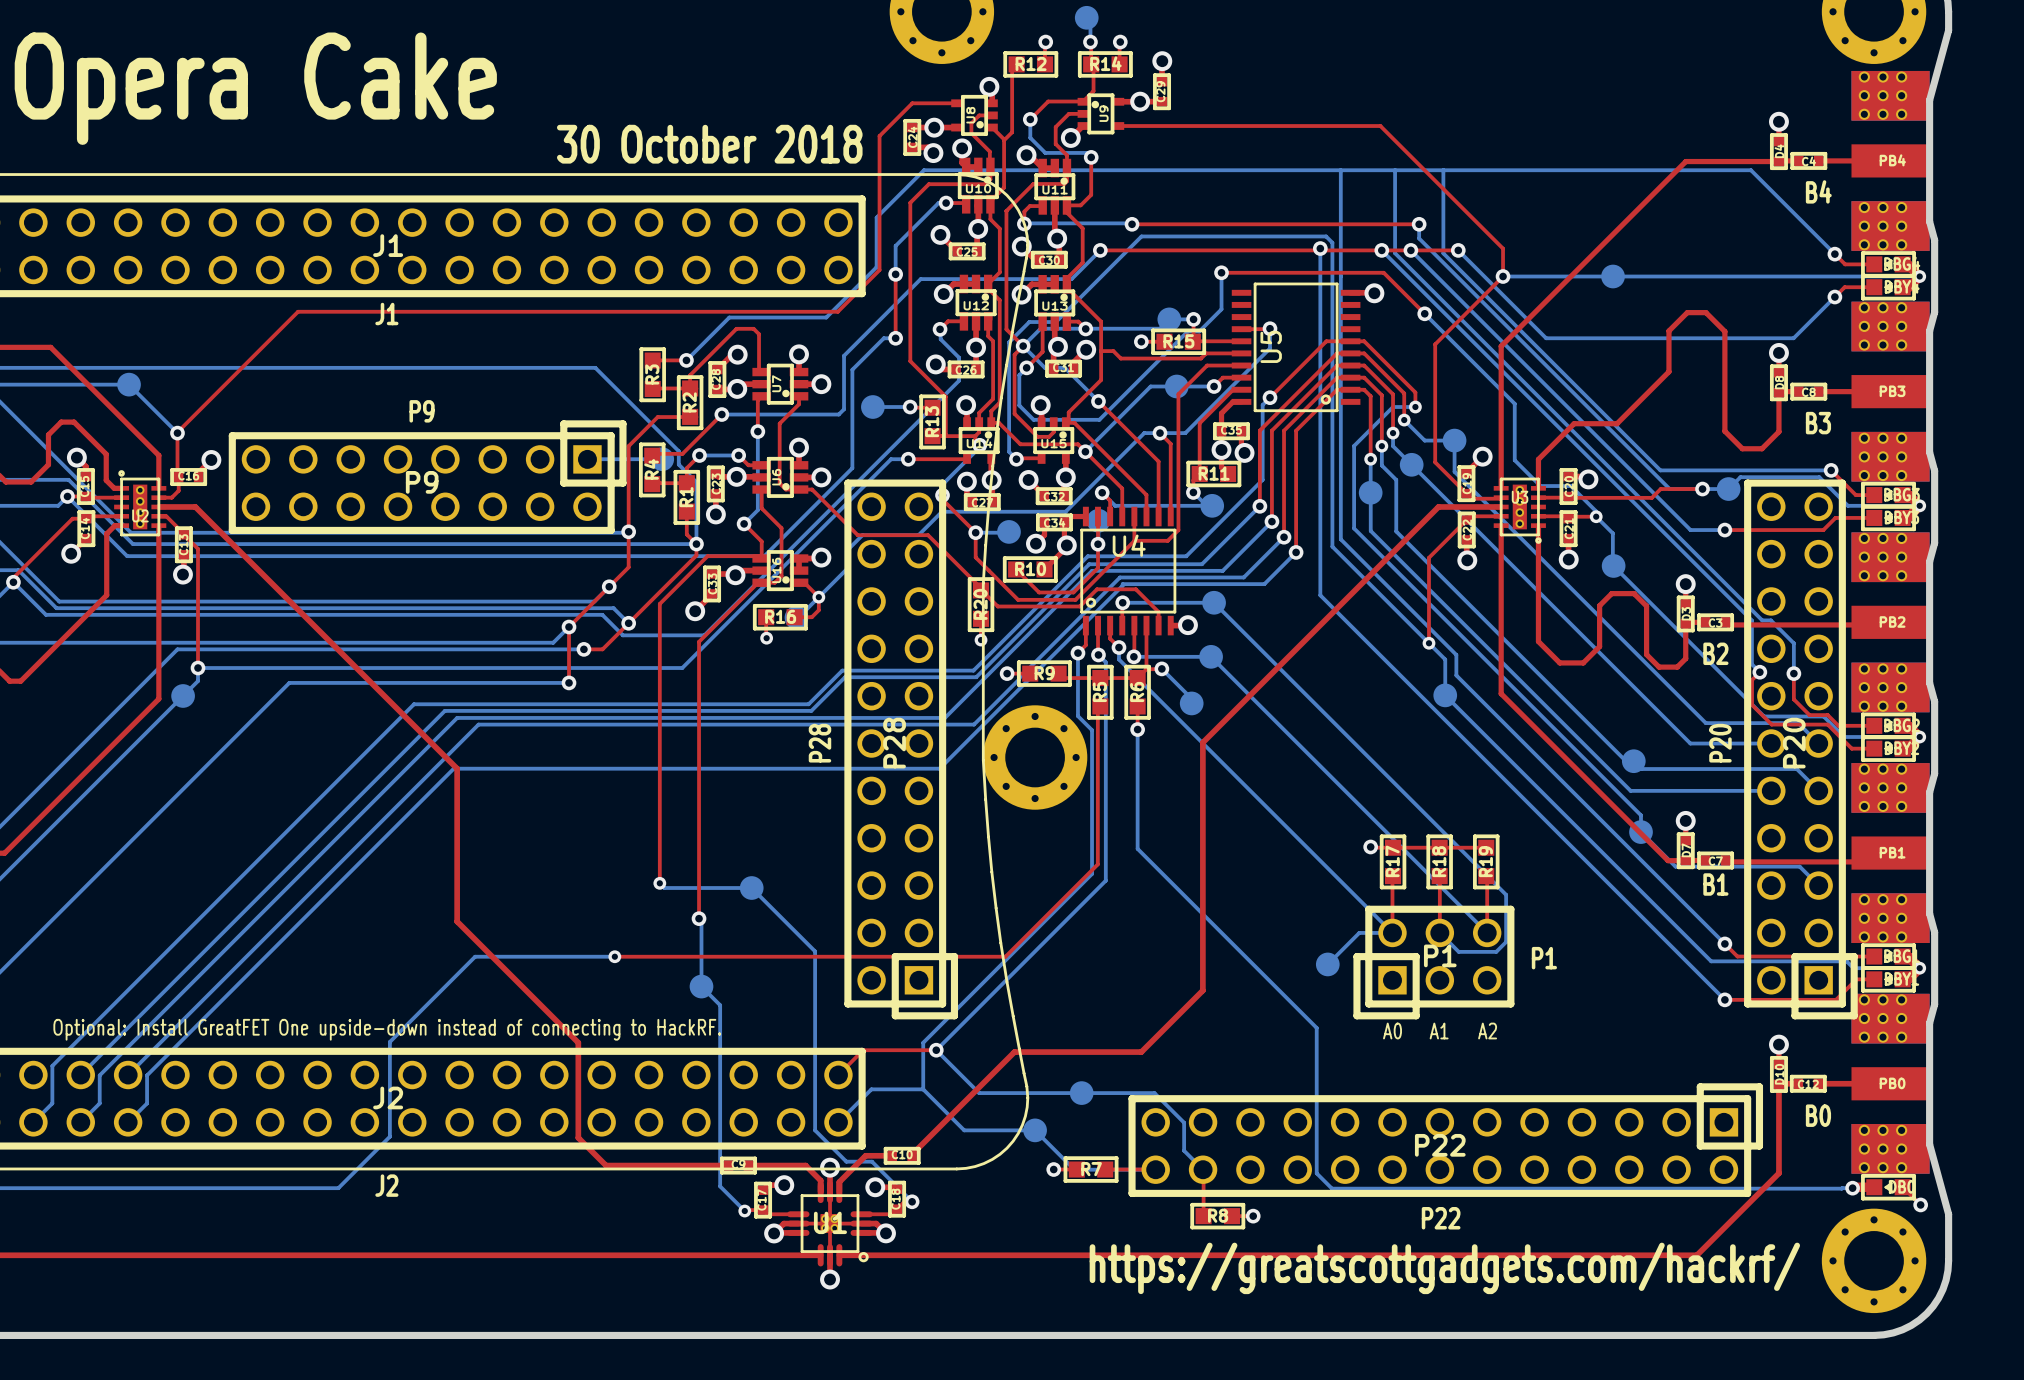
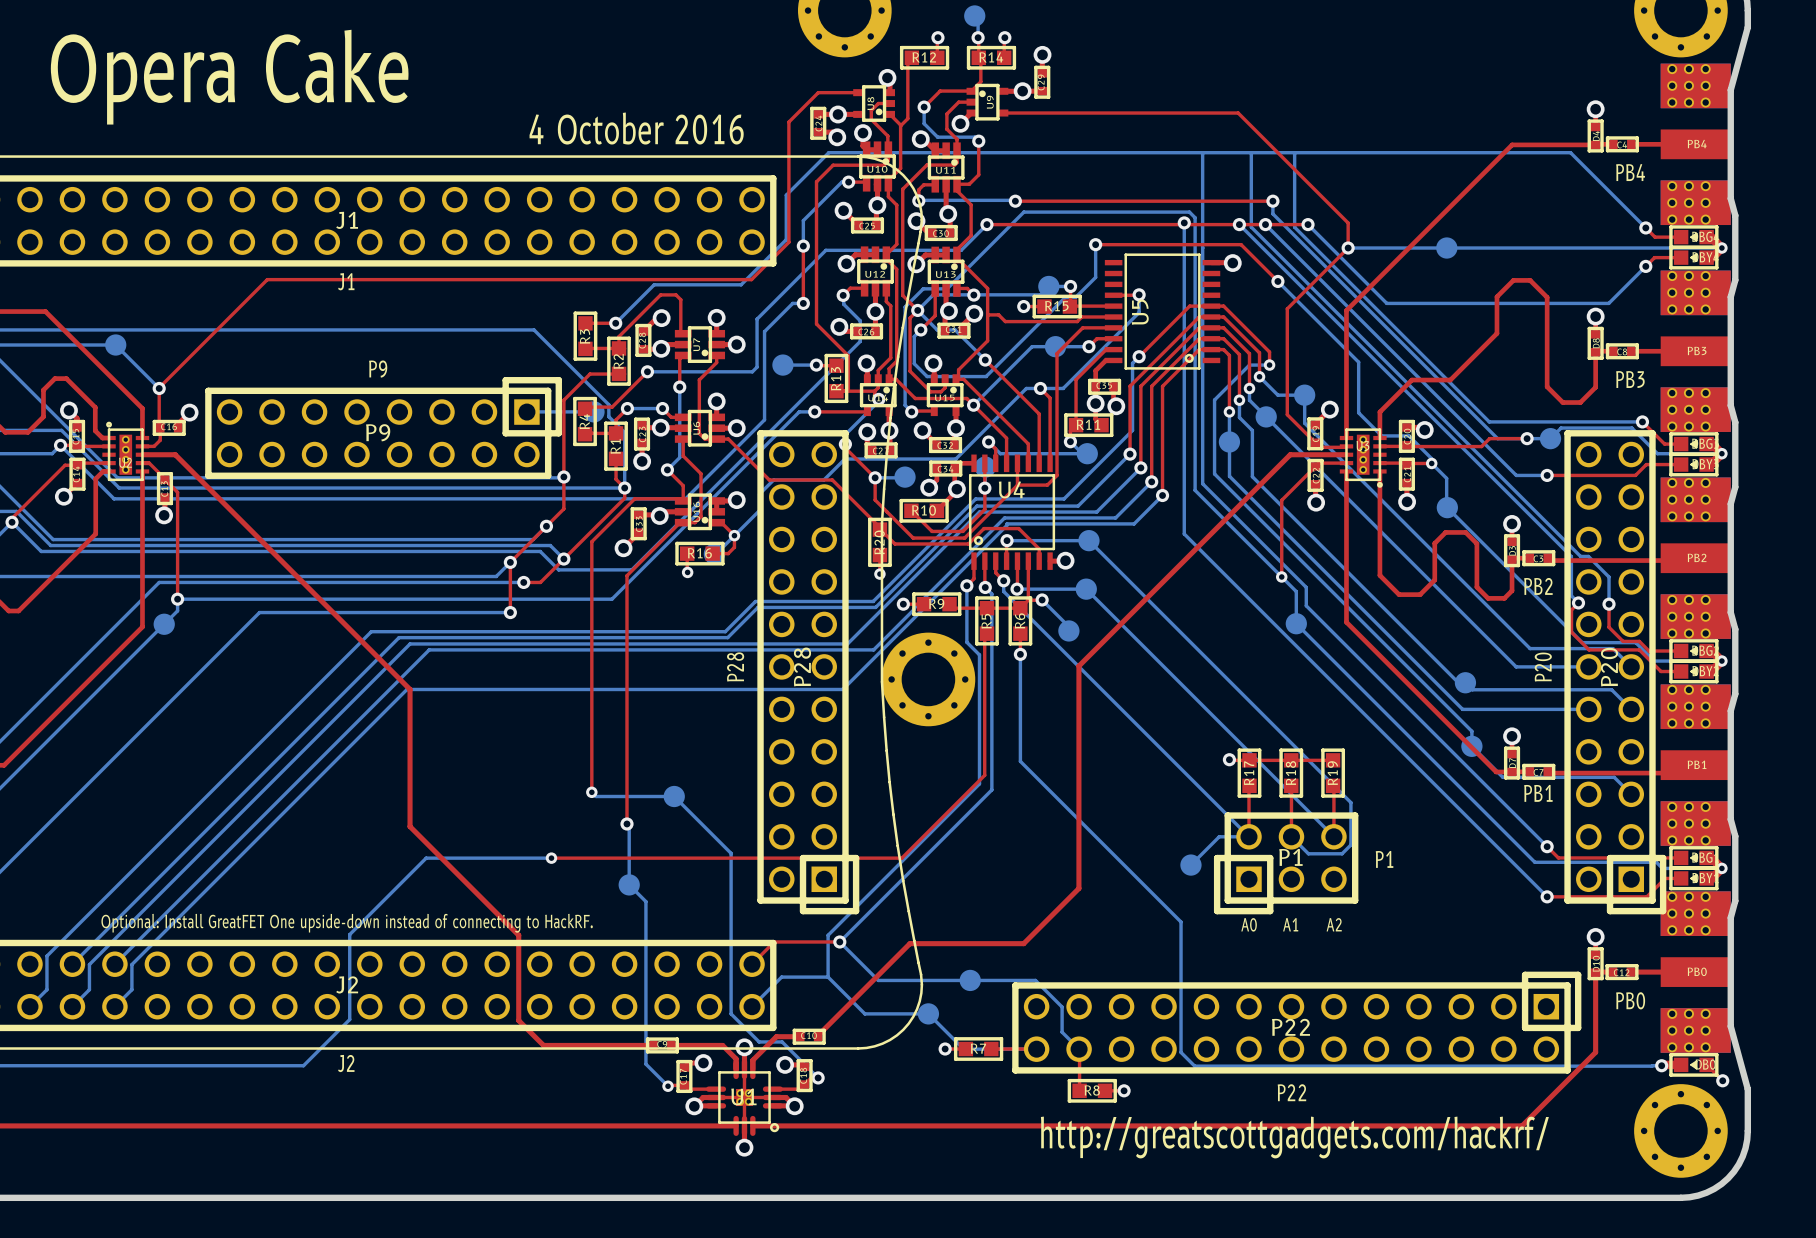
text: 30 October 2018 (709, 144) -> 4 October 2016 (636, 128)
text: B4 (1818, 191) -> PB4 (1630, 172)
text: B3 (1818, 423) -> PB3 (1630, 379)
text: B2 (1715, 653) -> PB2 (1538, 586)
text: B1 (1715, 884) -> PB1 (1538, 793)
text: B0 (1818, 1115) -> PB0 (1630, 1000)
text: https://greatscottgadgets.com/hackrf/ (1444, 1268) -> http://greatscottgadgets.com/hackrf/ (1294, 1137)

